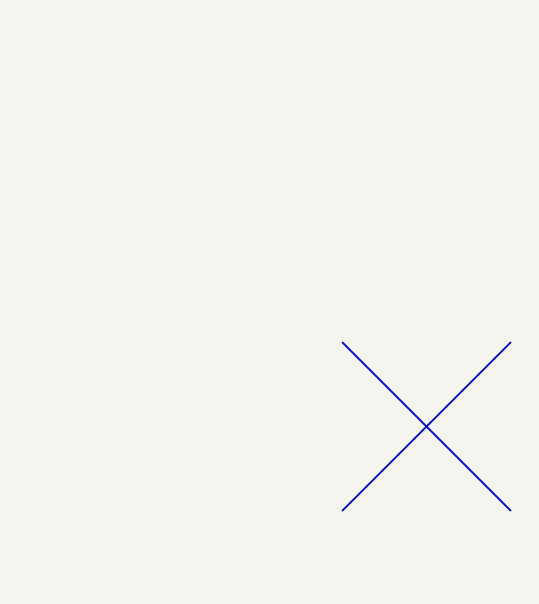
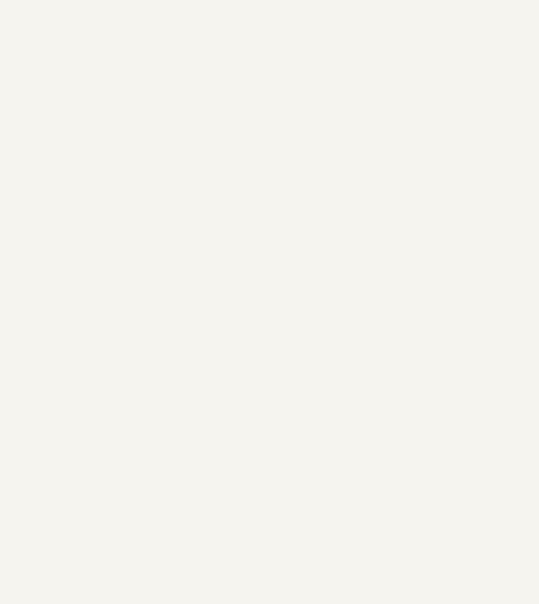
no-connect mark: (426, 426) -> none

